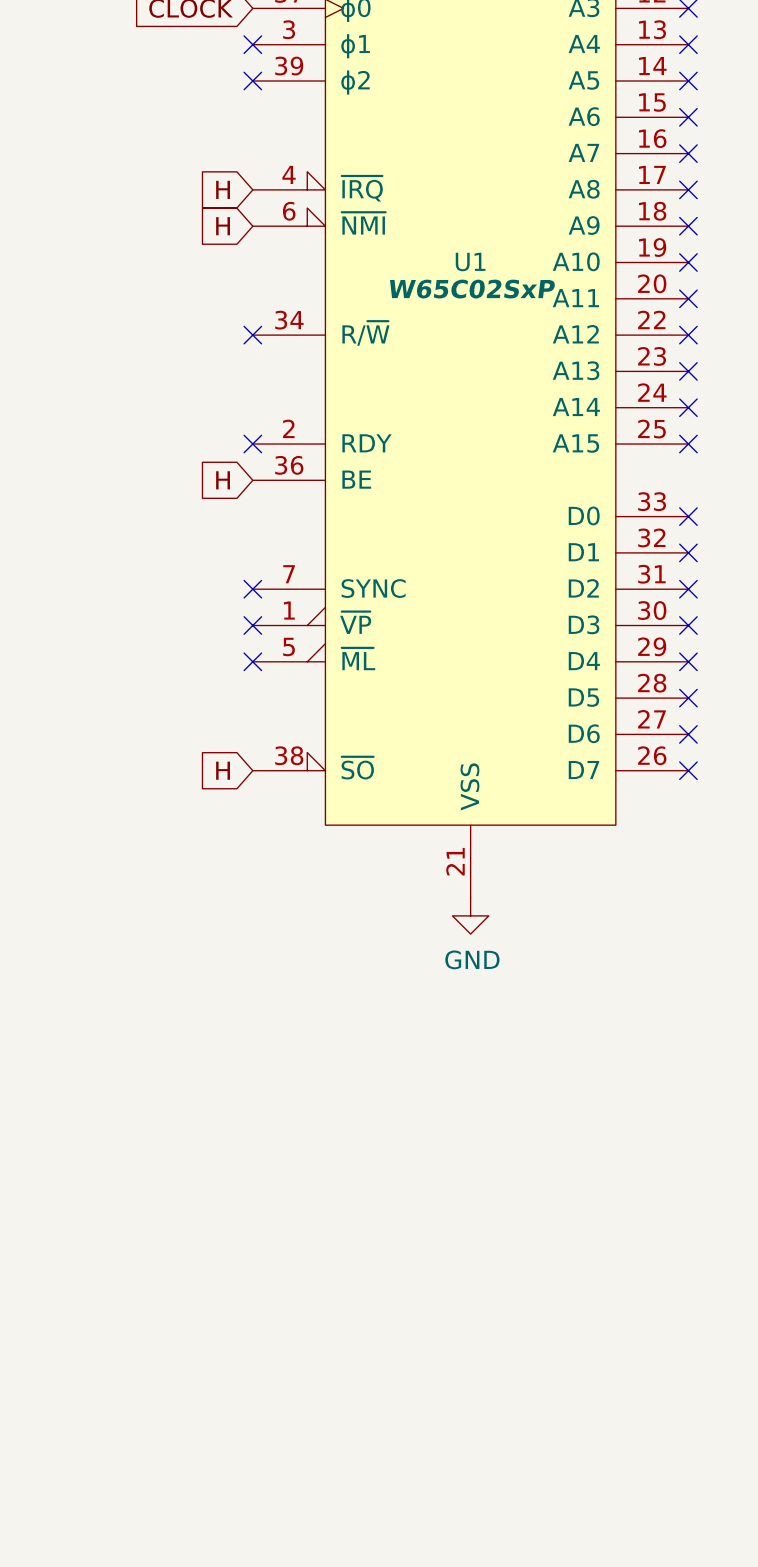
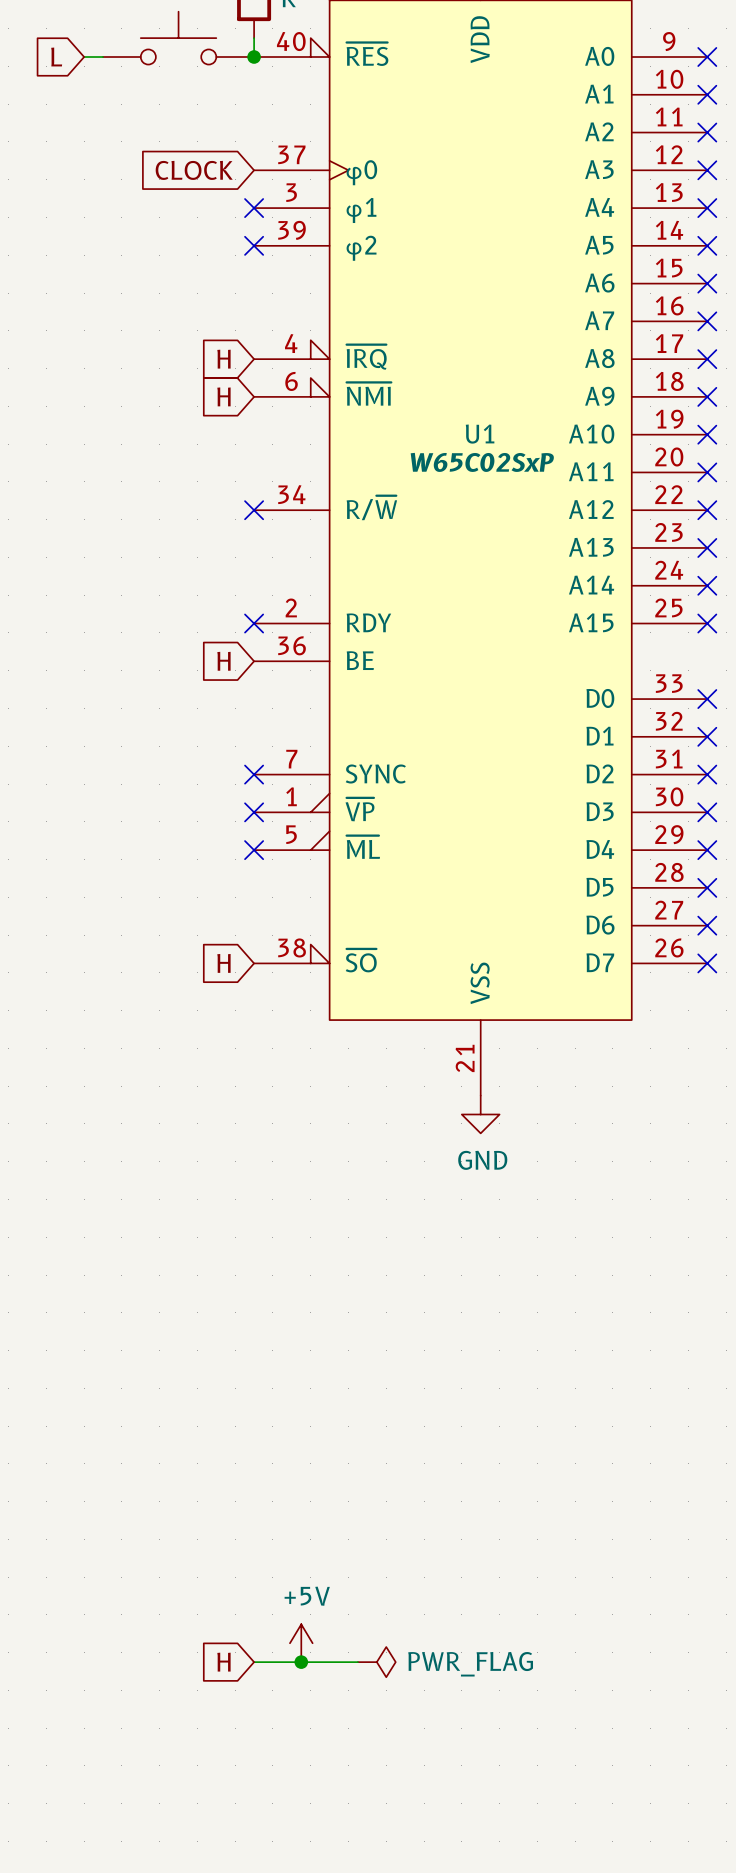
power symbol: none -> +5V (301, 1643)
global label: none -> H (223, 1662)
wire: none -> (254, 1662) (357, 1662)
junction: none -> (301, 1662)
power symbol: none -> PWR_FLAG (376, 1662)

